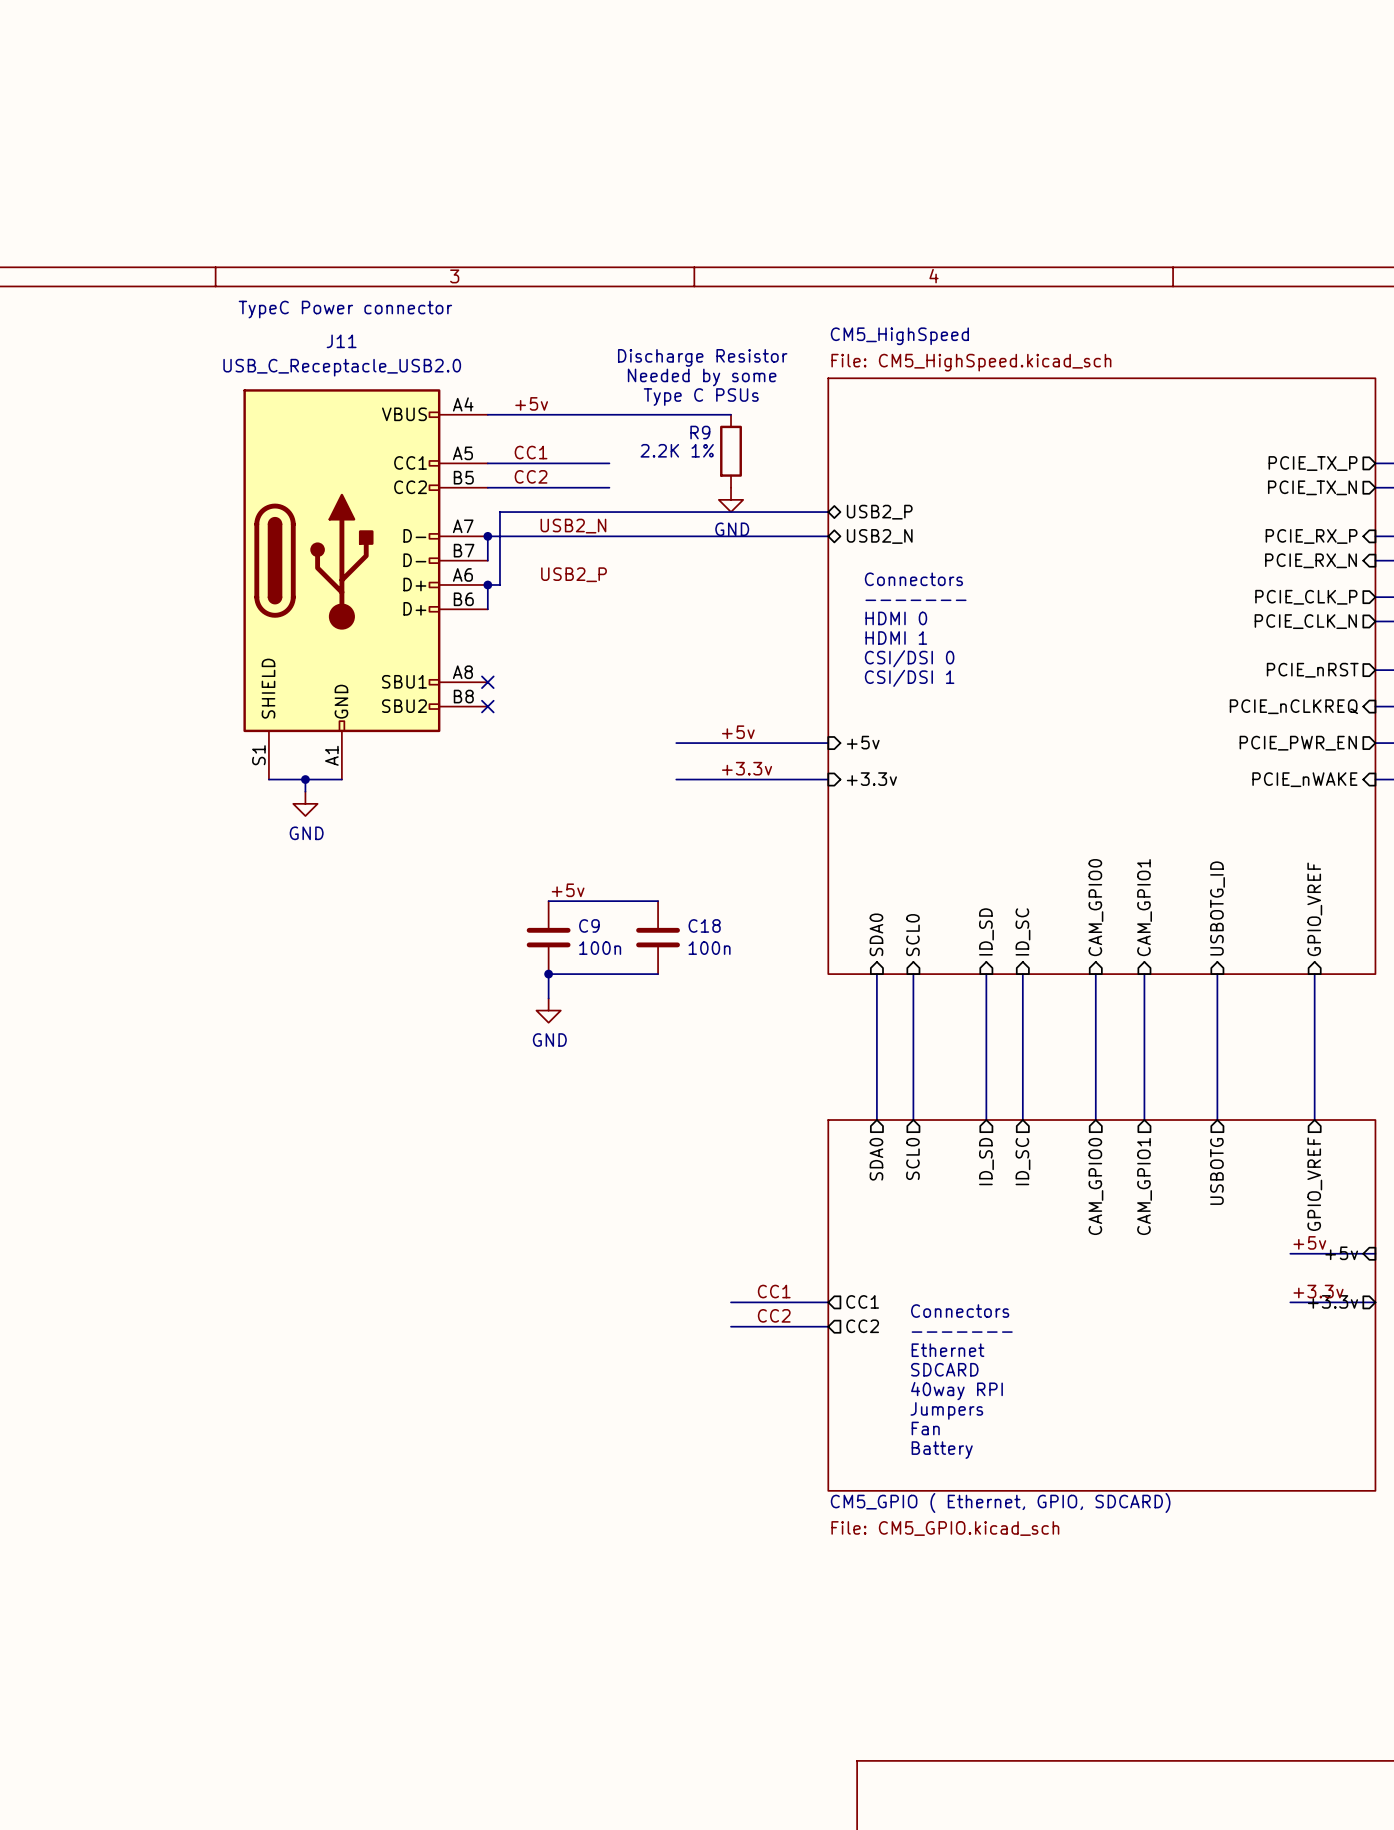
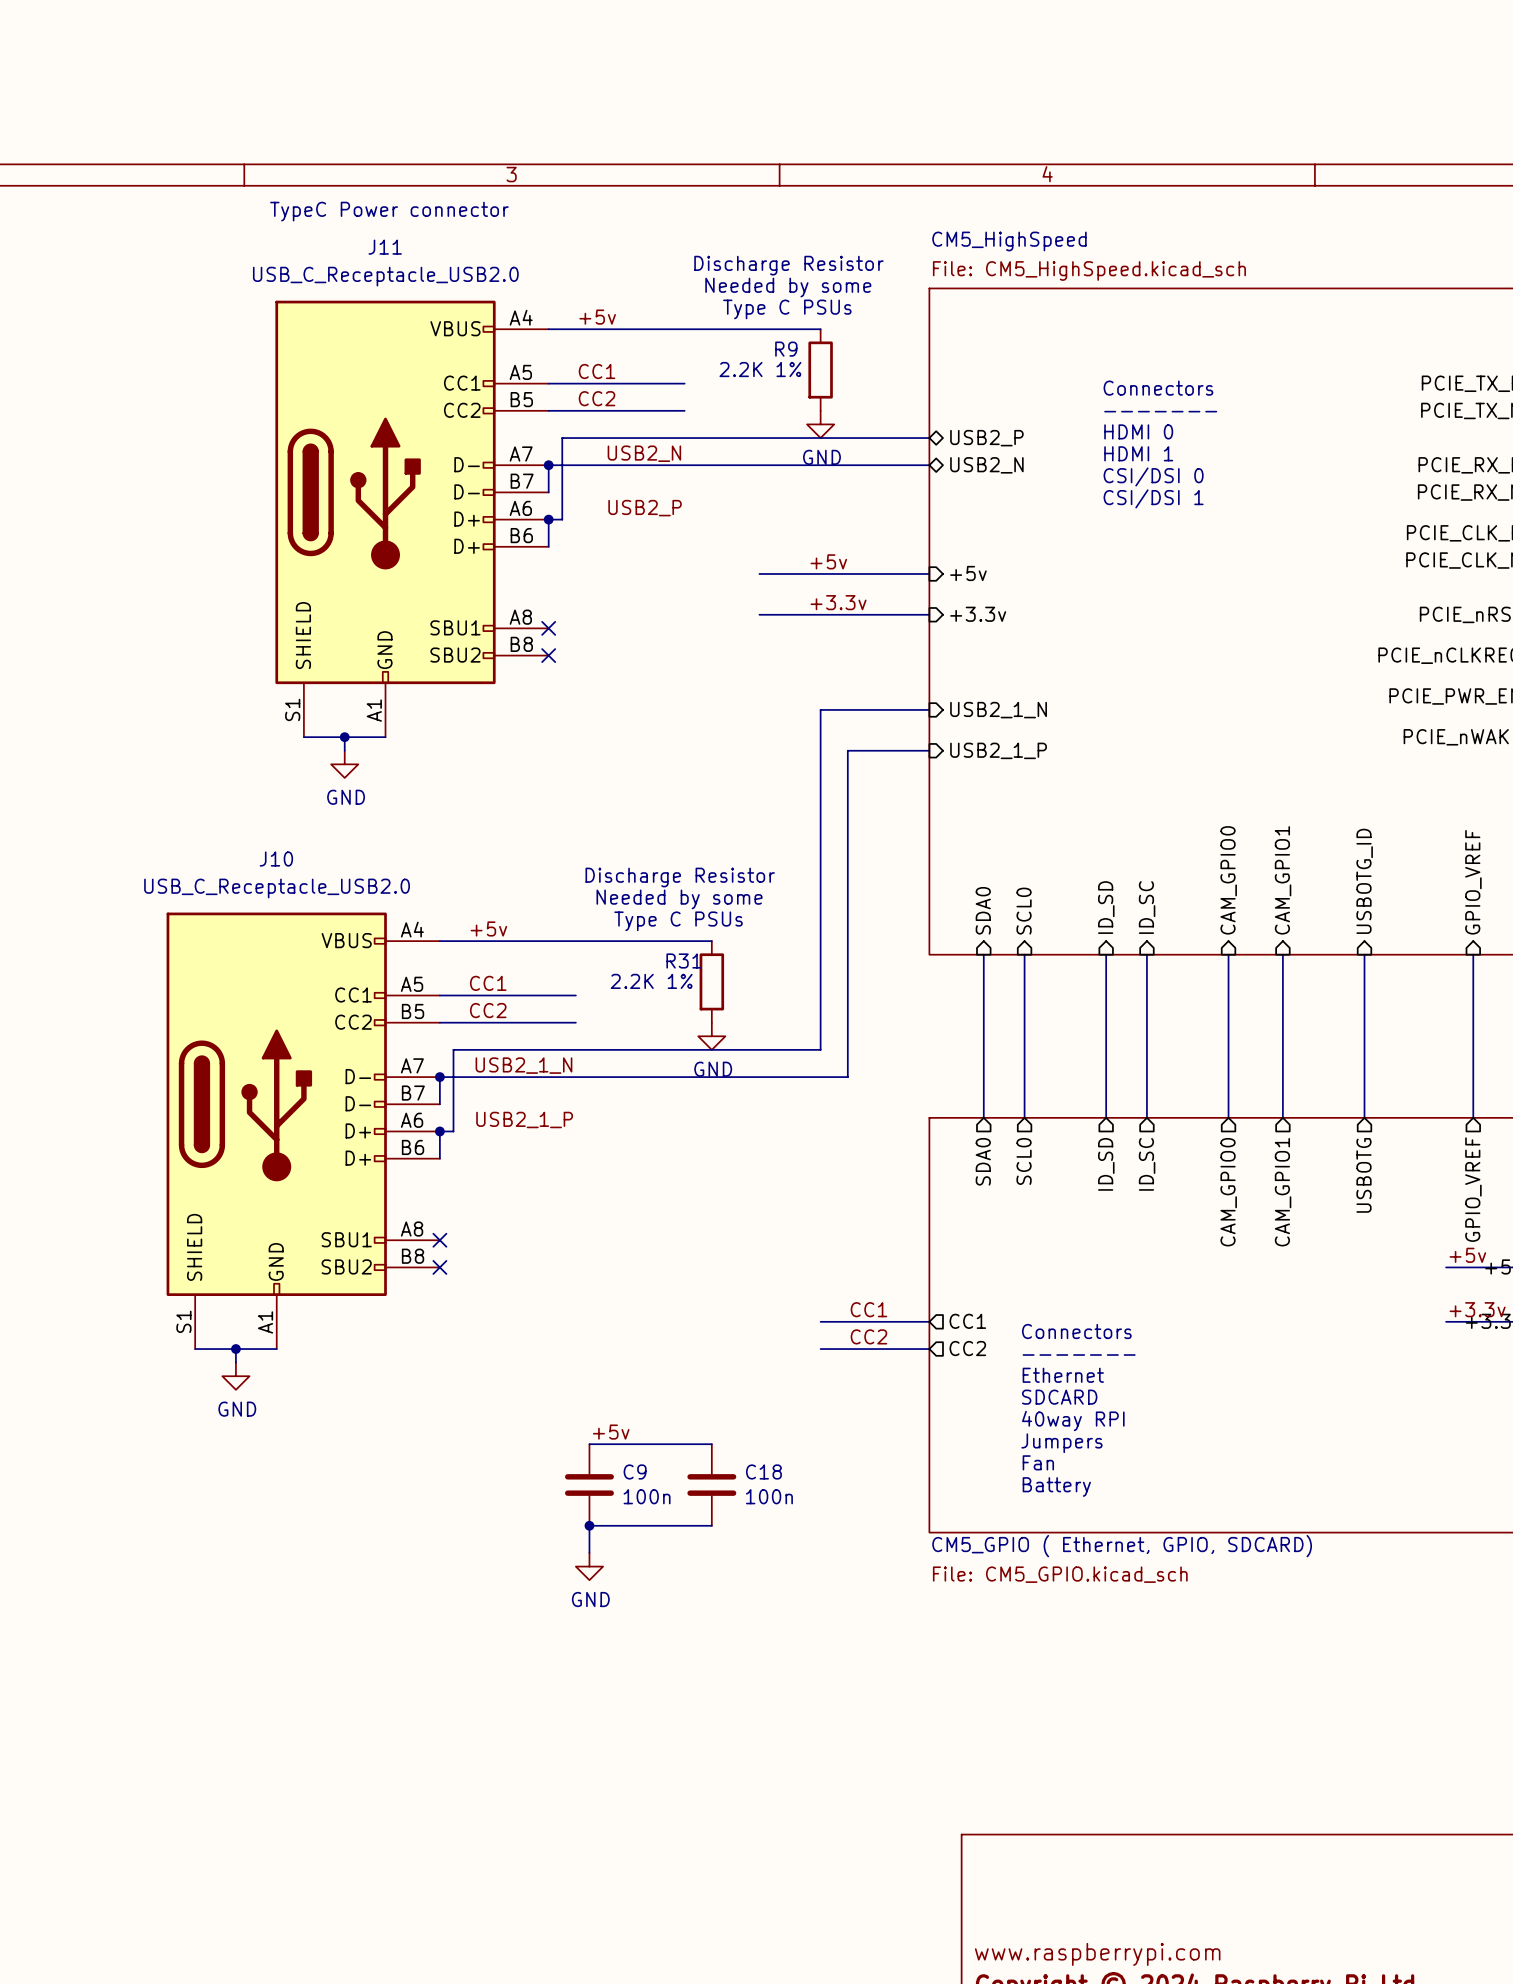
text position: Connectors (913, 579) -> Connectors (1158, 388)
text position: ------- (915, 600) -> ------- (1160, 411)
text position: HDMI 0 (896, 618) -> HDMI 0 (1138, 431)
text position: HDMI 1 (896, 638) -> HDMI 1 (1138, 453)
text position: CSI/DSI 0 (909, 658) -> CSI/DSI 0 (1153, 476)
text position: CSI/DSI 1 (909, 678) -> CSI/DSI 1 (1153, 498)
label position: +5v (738, 732) -> +5v (828, 561)
sheet pin position: +5v (863, 742) -> +5v (968, 573)
wire: (676, 743) (828, 743) -> (759, 573) (929, 573)
wire: none -> (929, 709) (820, 709) (820, 1049) (453, 1049) (453, 1131) (439, 1131) (439, 1158)
sheet pin: none -> USB2_1_N (998, 710)
label position: +3.3v (747, 768) -> +3.3v (838, 602)
wire: (676, 779) (828, 779) -> (759, 614) (929, 614)
sheet pin position: +3.3v (871, 779) -> +3.3v (978, 614)
wire: none -> (929, 750) (847, 750) (847, 1077) (439, 1077) (439, 1104)
sheet pin: none -> USB2_1_P (998, 750)
label position: +5v (568, 890) -> +5v (488, 928)
wire: (548, 901) (658, 901) -> none
text: none -> Discharge Resistor (680, 877)
text: none -> Needed by some (679, 899)
C9 position: (548, 937) -> (589, 1484)
C18 position: (658, 937) -> (711, 1484)
text: none -> Type C PSUs (678, 921)
wire: none -> (439, 941) (711, 941)
junction: (548, 974) -> none
wire: (658, 974) (548, 974) (548, 998) -> none
R31: none -> 2.2K 1% (711, 981)
label: none -> CC1 (488, 983)
wire: none -> (439, 995) (575, 995)
power symbol position: GND (548, 1010) -> GND (711, 1036)
label: none -> CC2 (488, 1010)
wire: none -> (439, 1022) (575, 1022)
label: none -> USB2_1_N (523, 1065)
junction: none -> (439, 1077)
label: none -> USB2_1_P (524, 1119)
J10: none -> USB_C_Receptacle_USB2.0 (303, 1130)
junction: none -> (439, 1131)
no-connect mark: none -> (439, 1240)
no-connect mark: none -> (439, 1267)
wire: none -> (195, 1349) (276, 1349)
wire: none -> (235, 1349) (235, 1362)
junction: none -> (235, 1349)
power symbol: none -> GND (235, 1376)
label: none -> +5v (611, 1432)
wire: none -> (589, 1444) (711, 1444)
junction: none -> (589, 1525)
wire: none -> (711, 1525) (589, 1525) (589, 1552)
power symbol: none -> GND (589, 1566)

